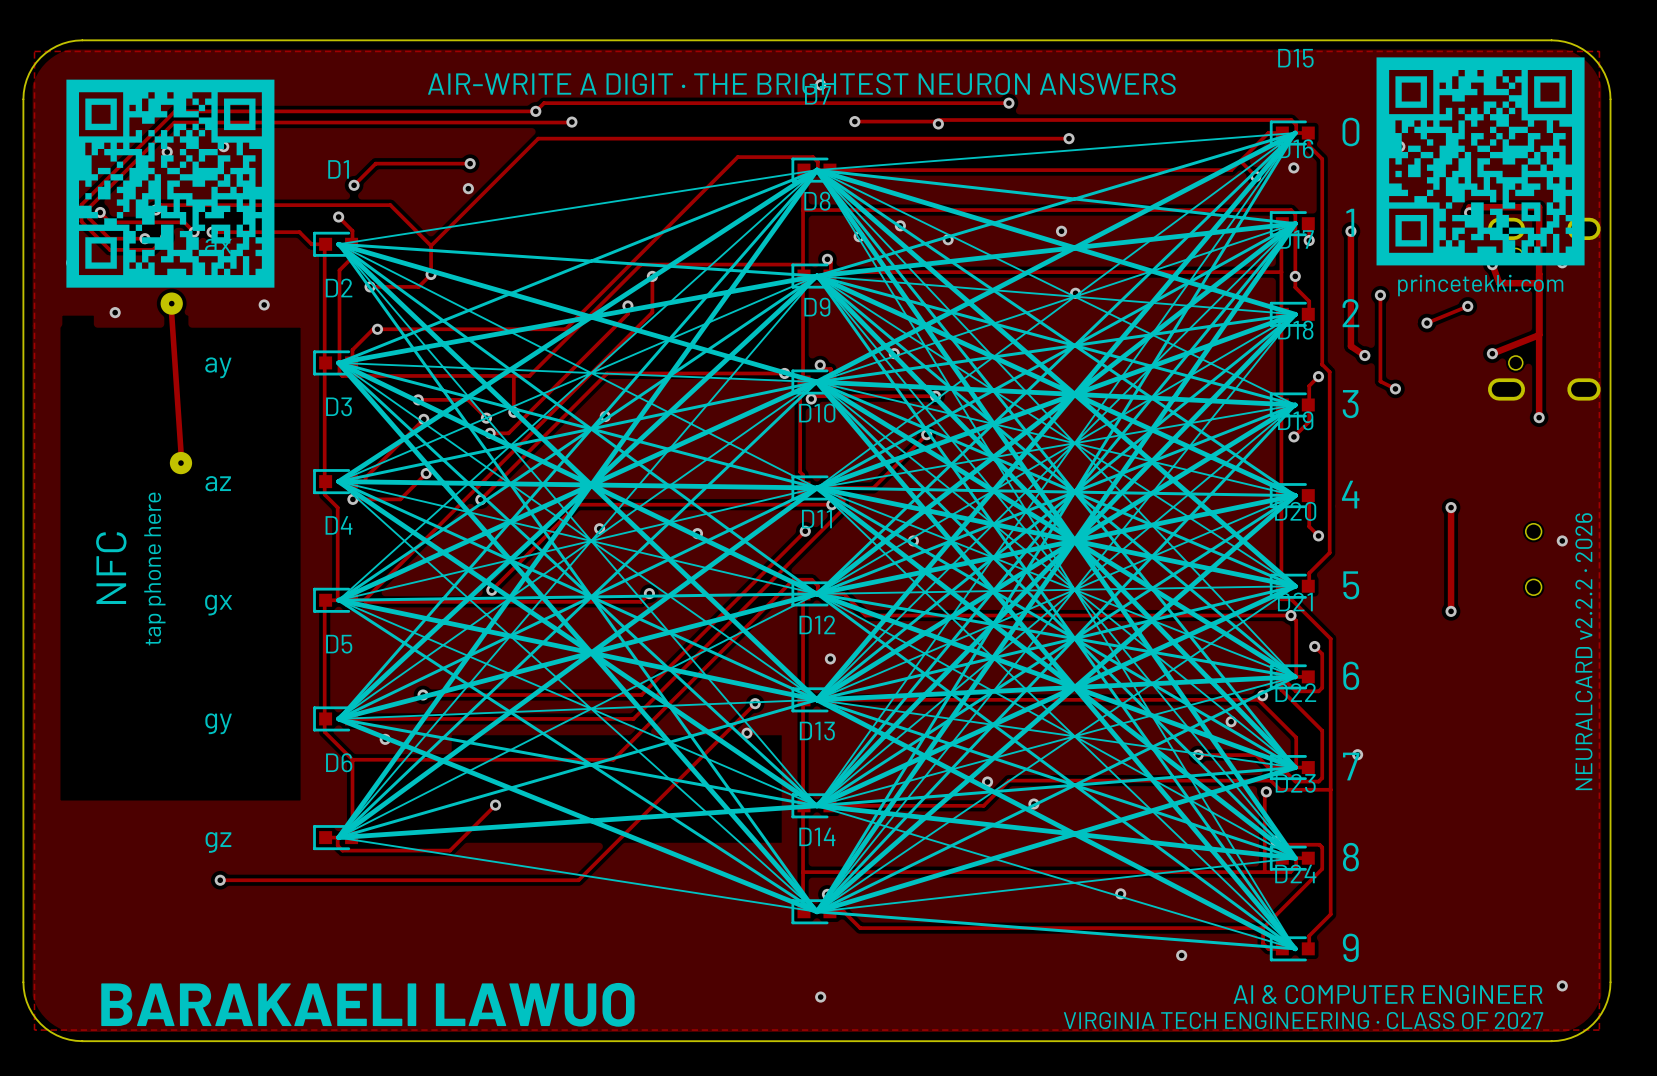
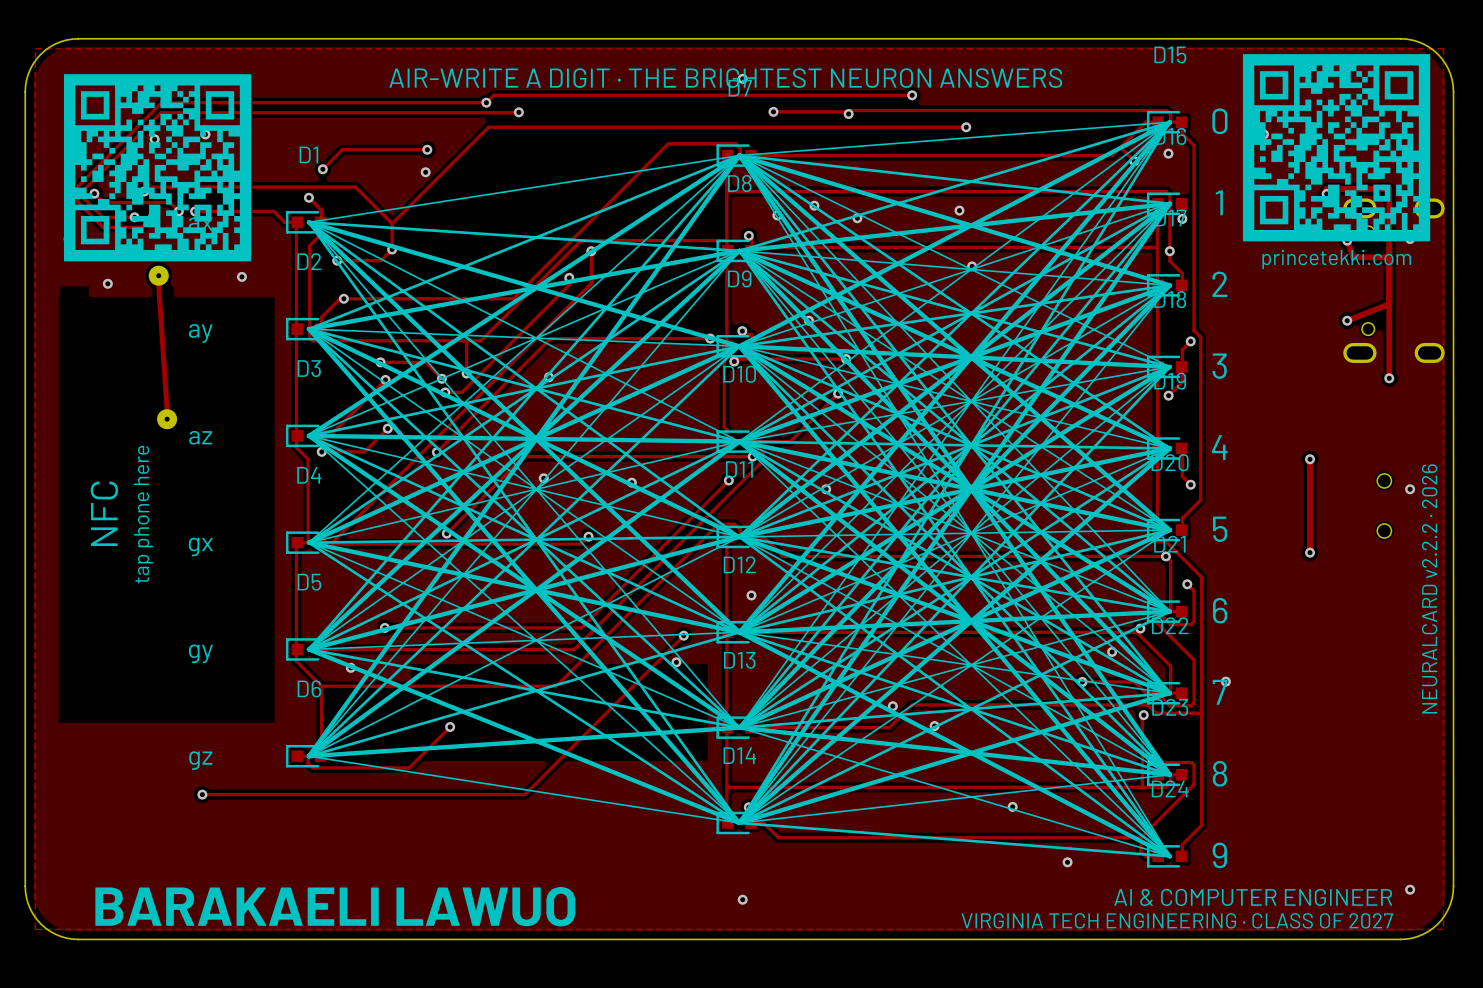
track: (1350, 231) (1350, 346) (1364, 355) -> none
via: (1350, 231) -> none
track: (1380, 295) (1380, 381) (1395, 388) -> none
via: (1380, 295) -> none
track: (1467, 306) (1426, 323) -> none
via: (1467, 306) -> none
via: (1426, 323) -> none
via: (1364, 355) -> none
via: (1395, 388) -> none

